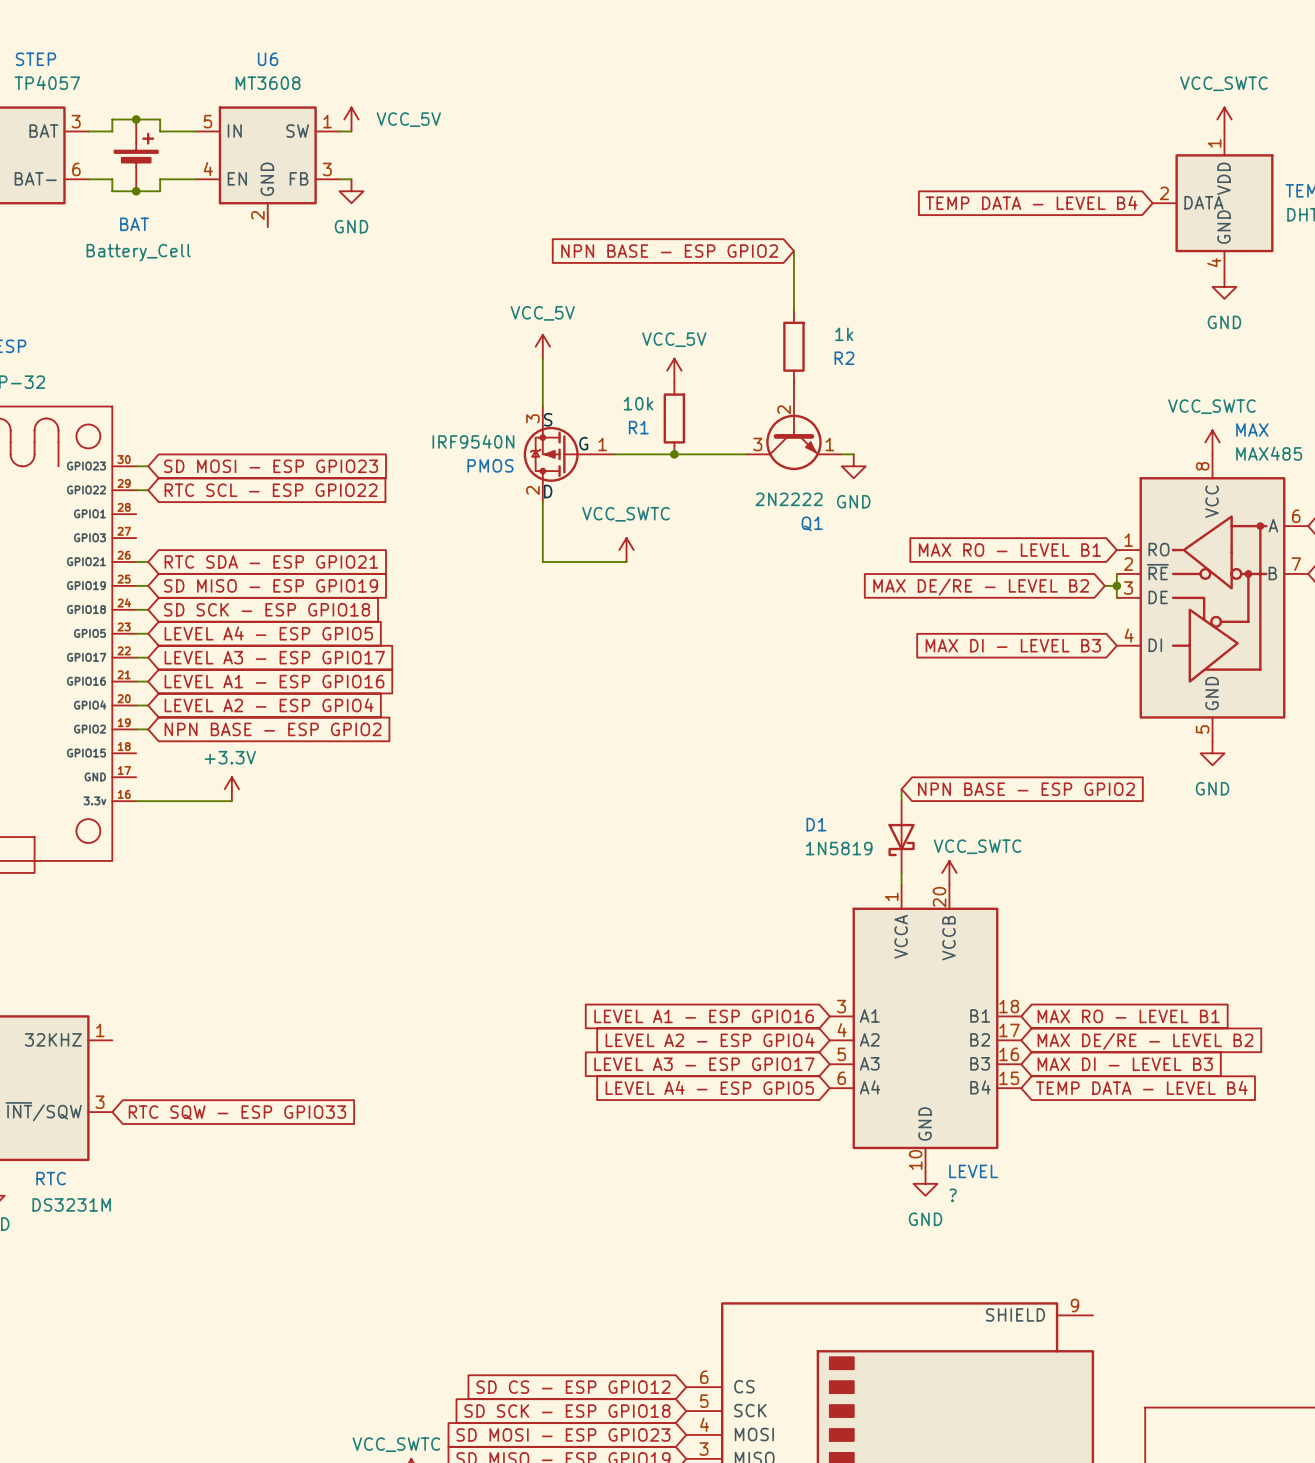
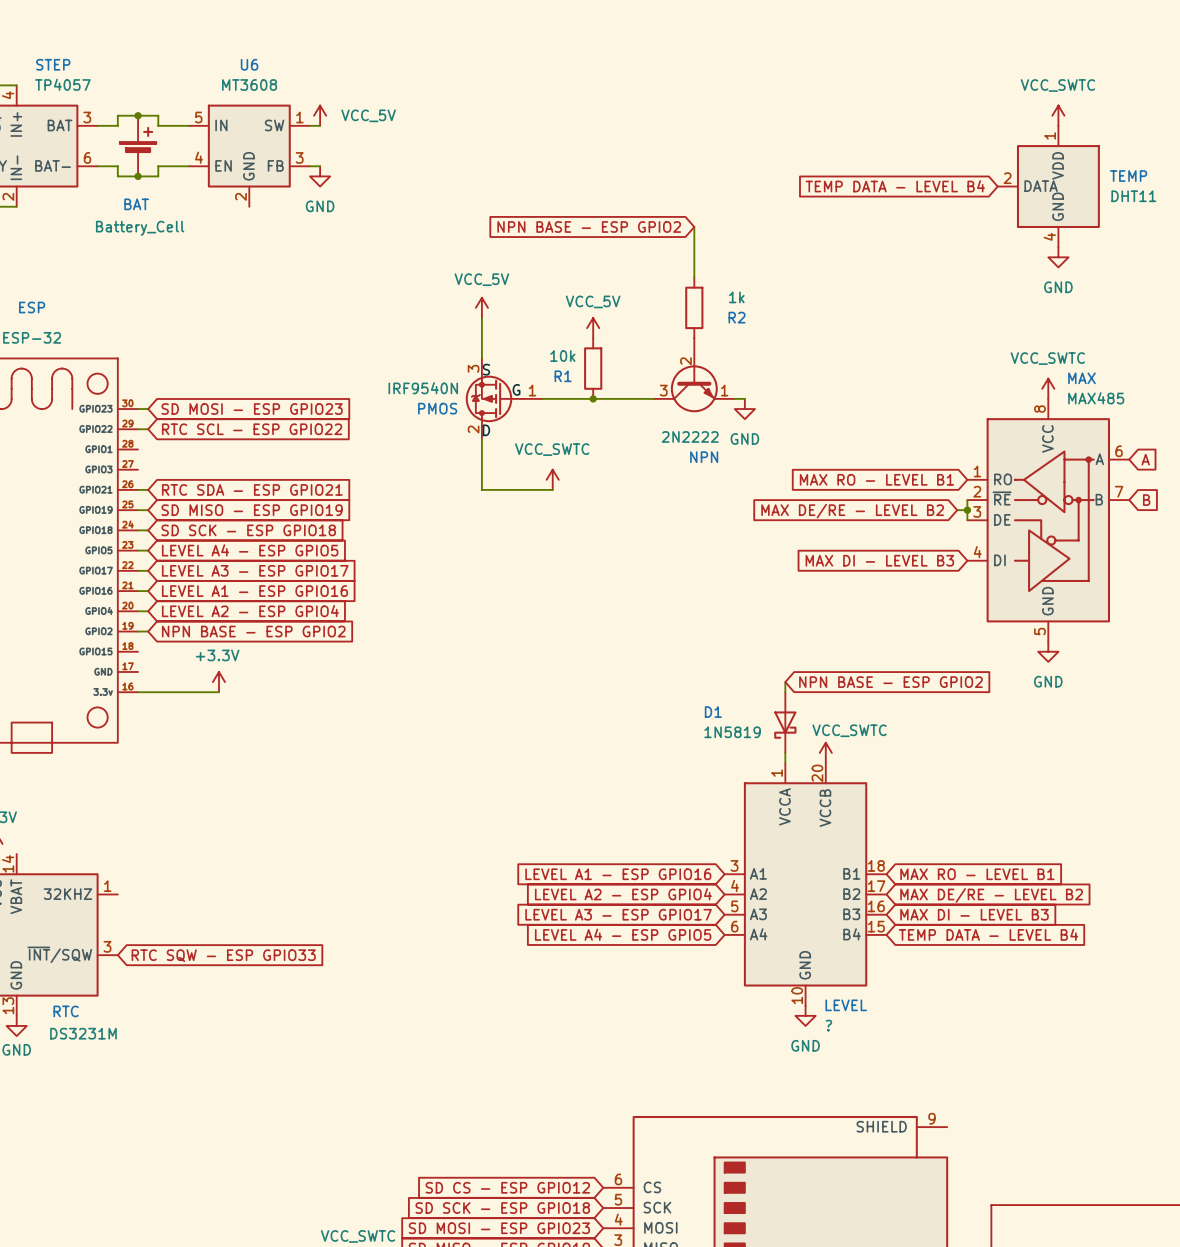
Q1 name: Q1 (812, 523) -> NPN (704, 457)

